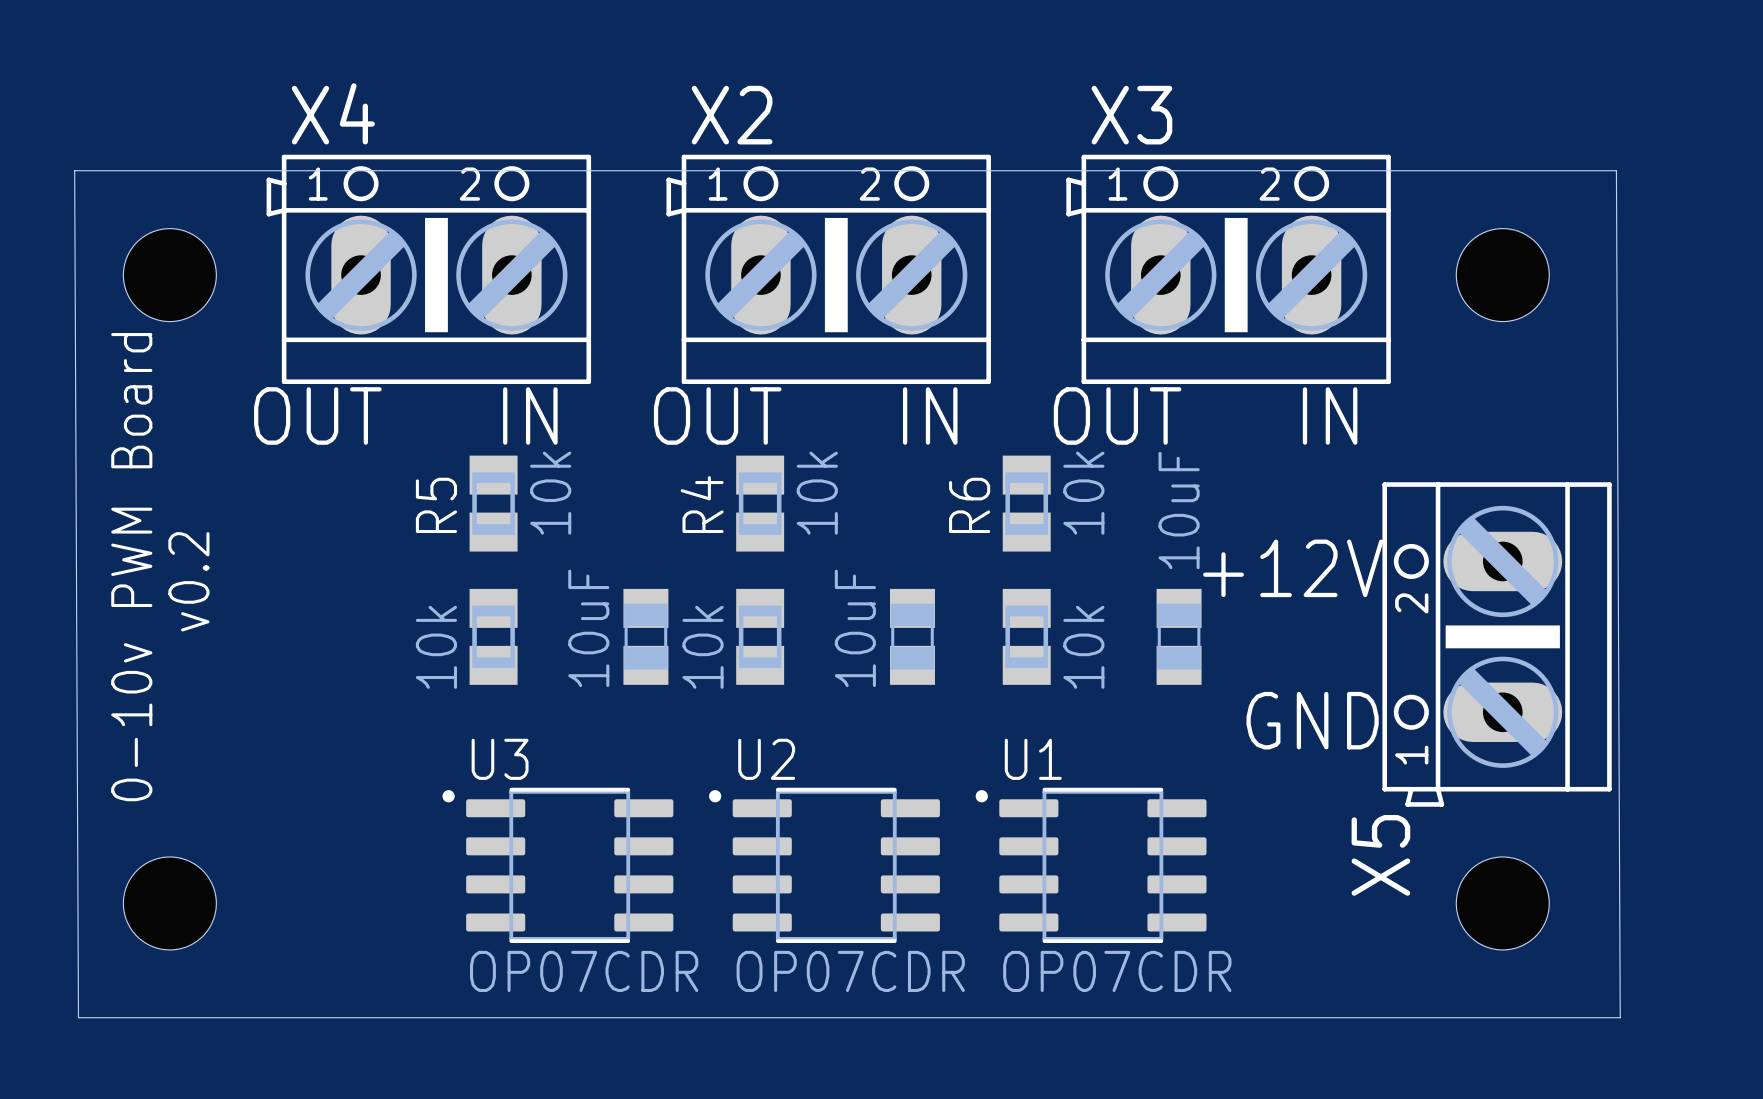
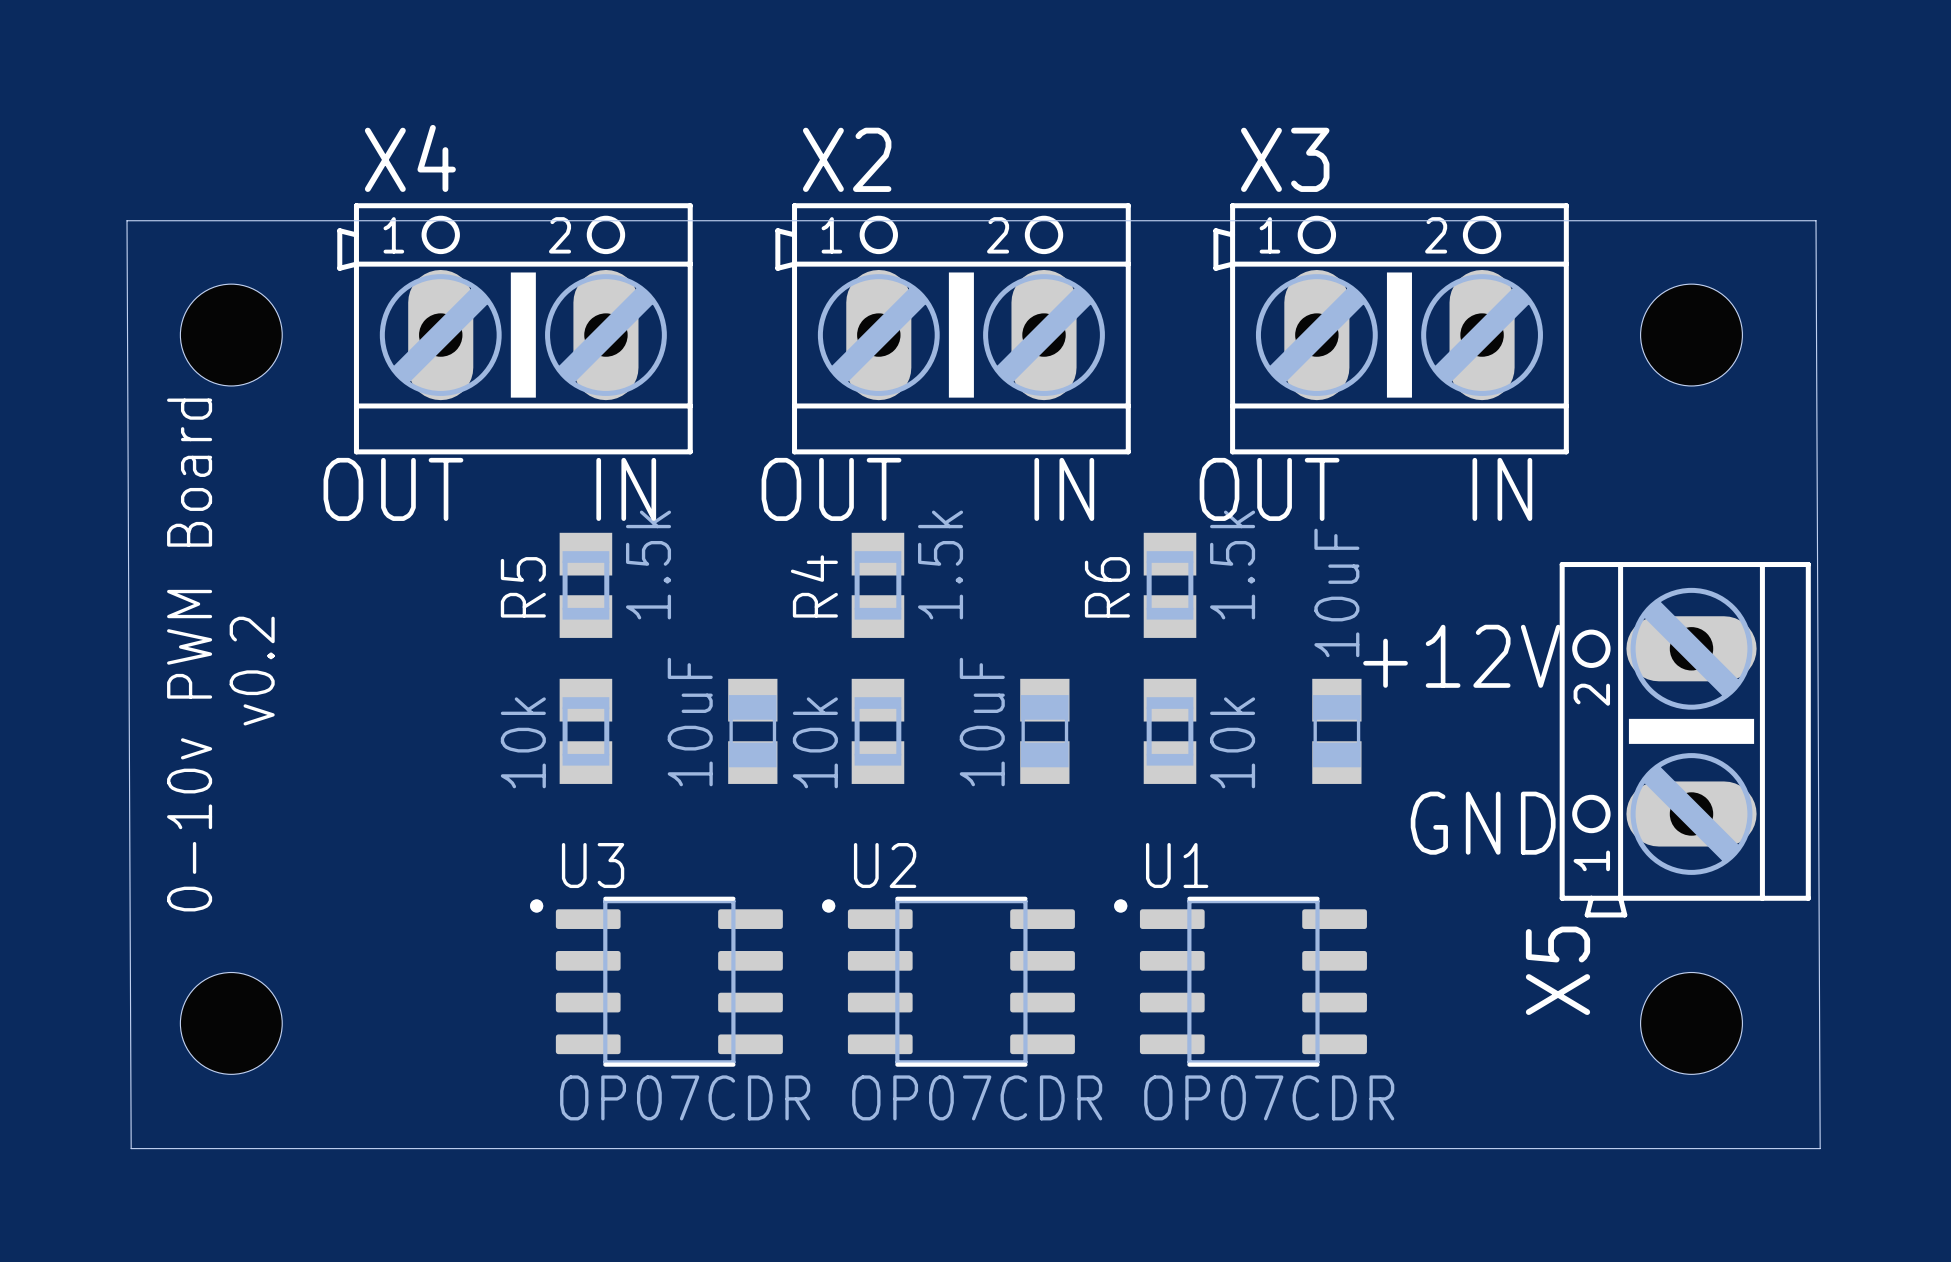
R5 value: 10k (550, 493) -> 1.5k (648, 565)
R4 value: 10k (817, 493) -> 1.5k (940, 565)
R6 value: 10k (1083, 493) -> 1.5k (1232, 565)

